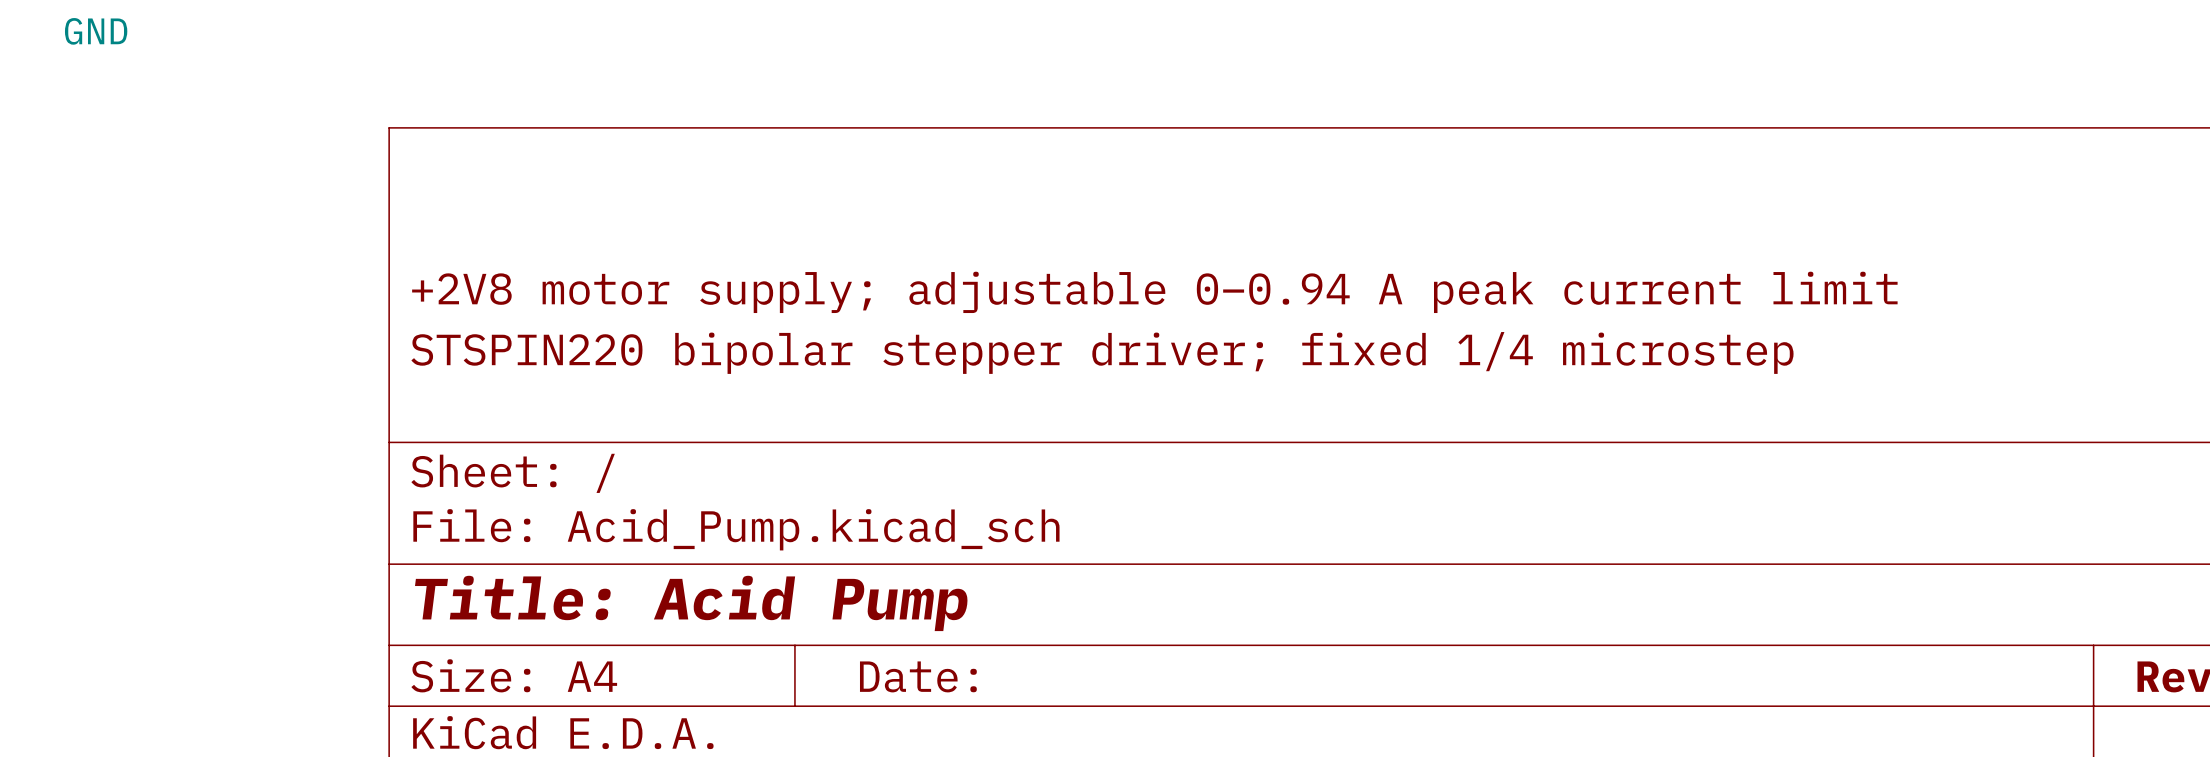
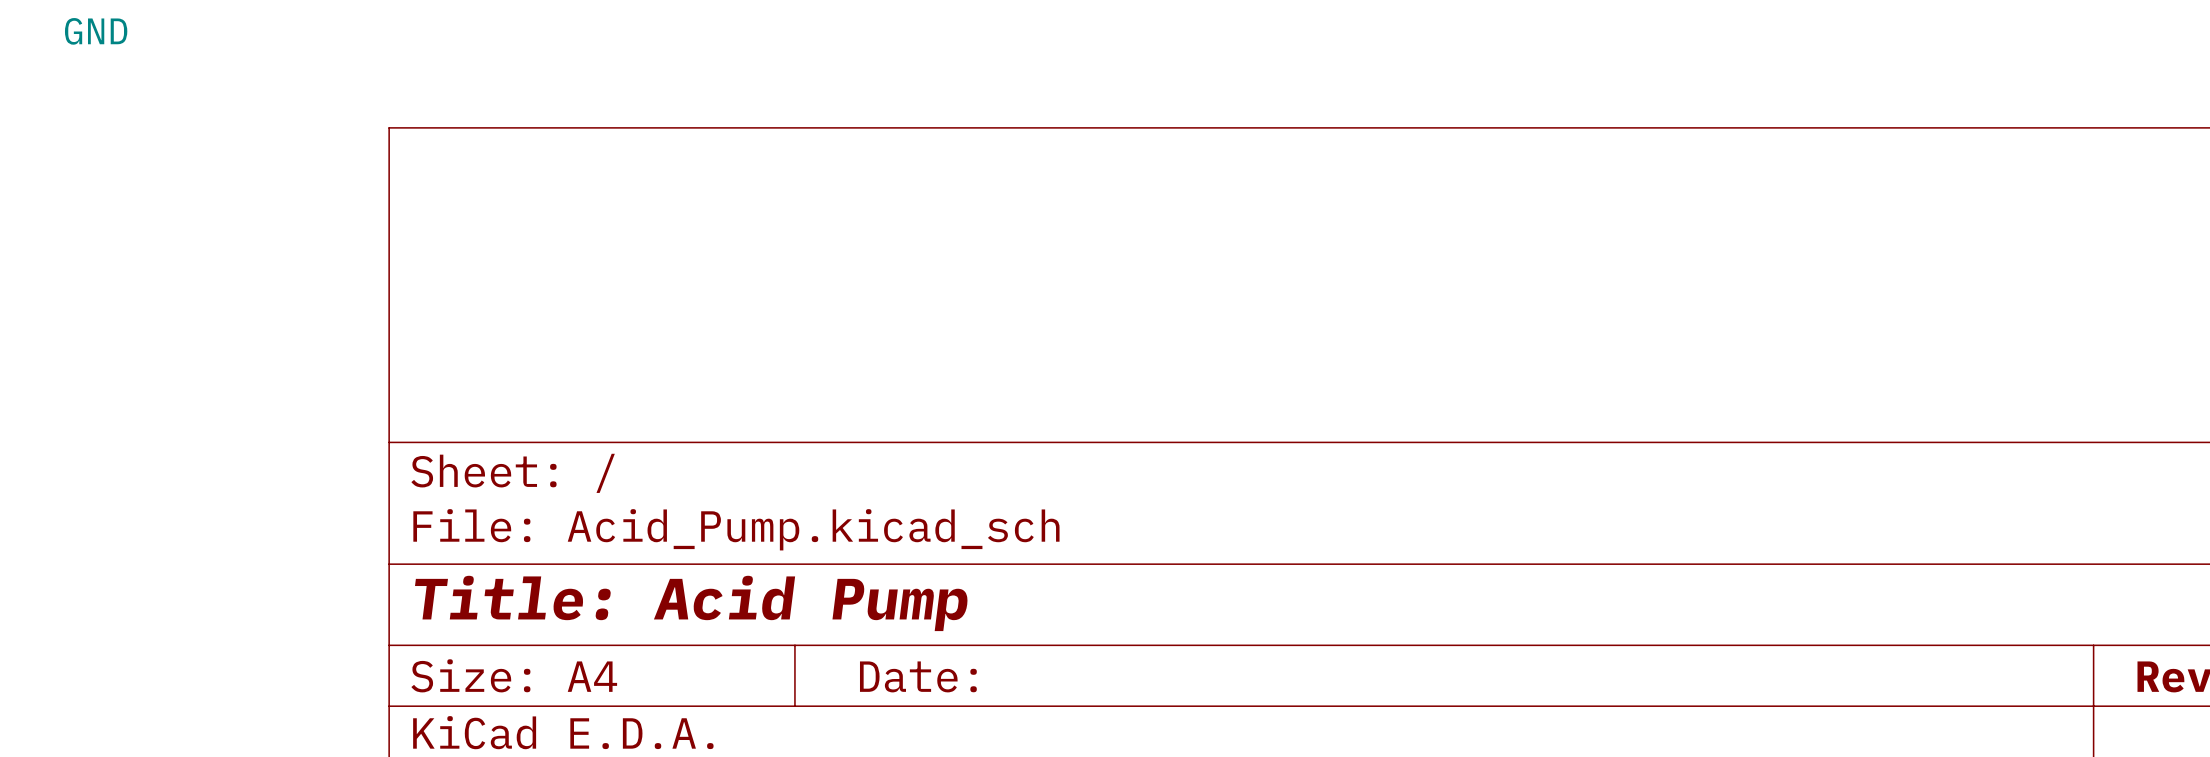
title block: +2V8 motor supply; adjustable 0–0.94 A peak current limit (1154, 292) -> none
title block: STSPIN220 bipolar stepper driver; fixed 1/4 microstep (1102, 352) -> none

